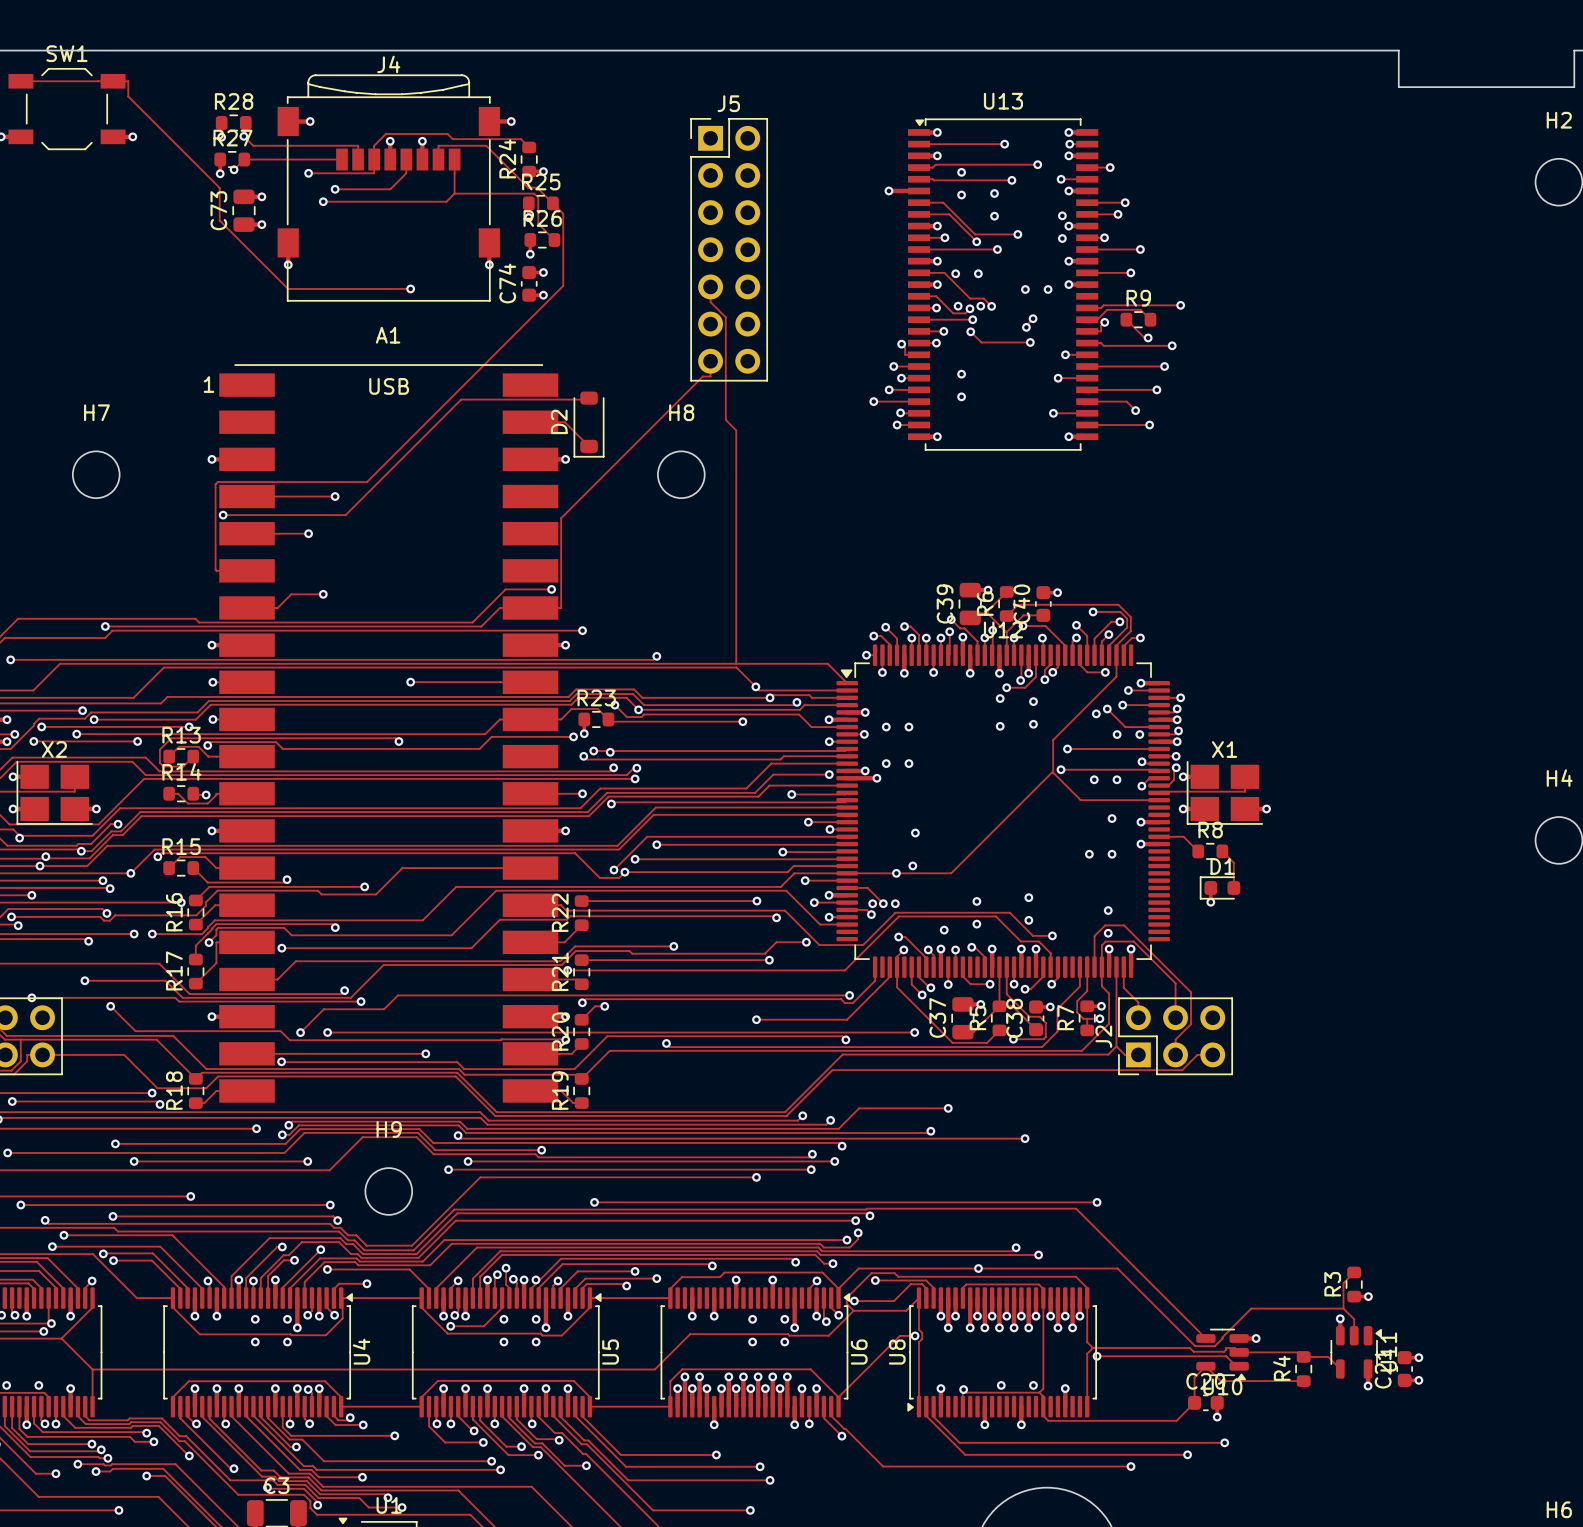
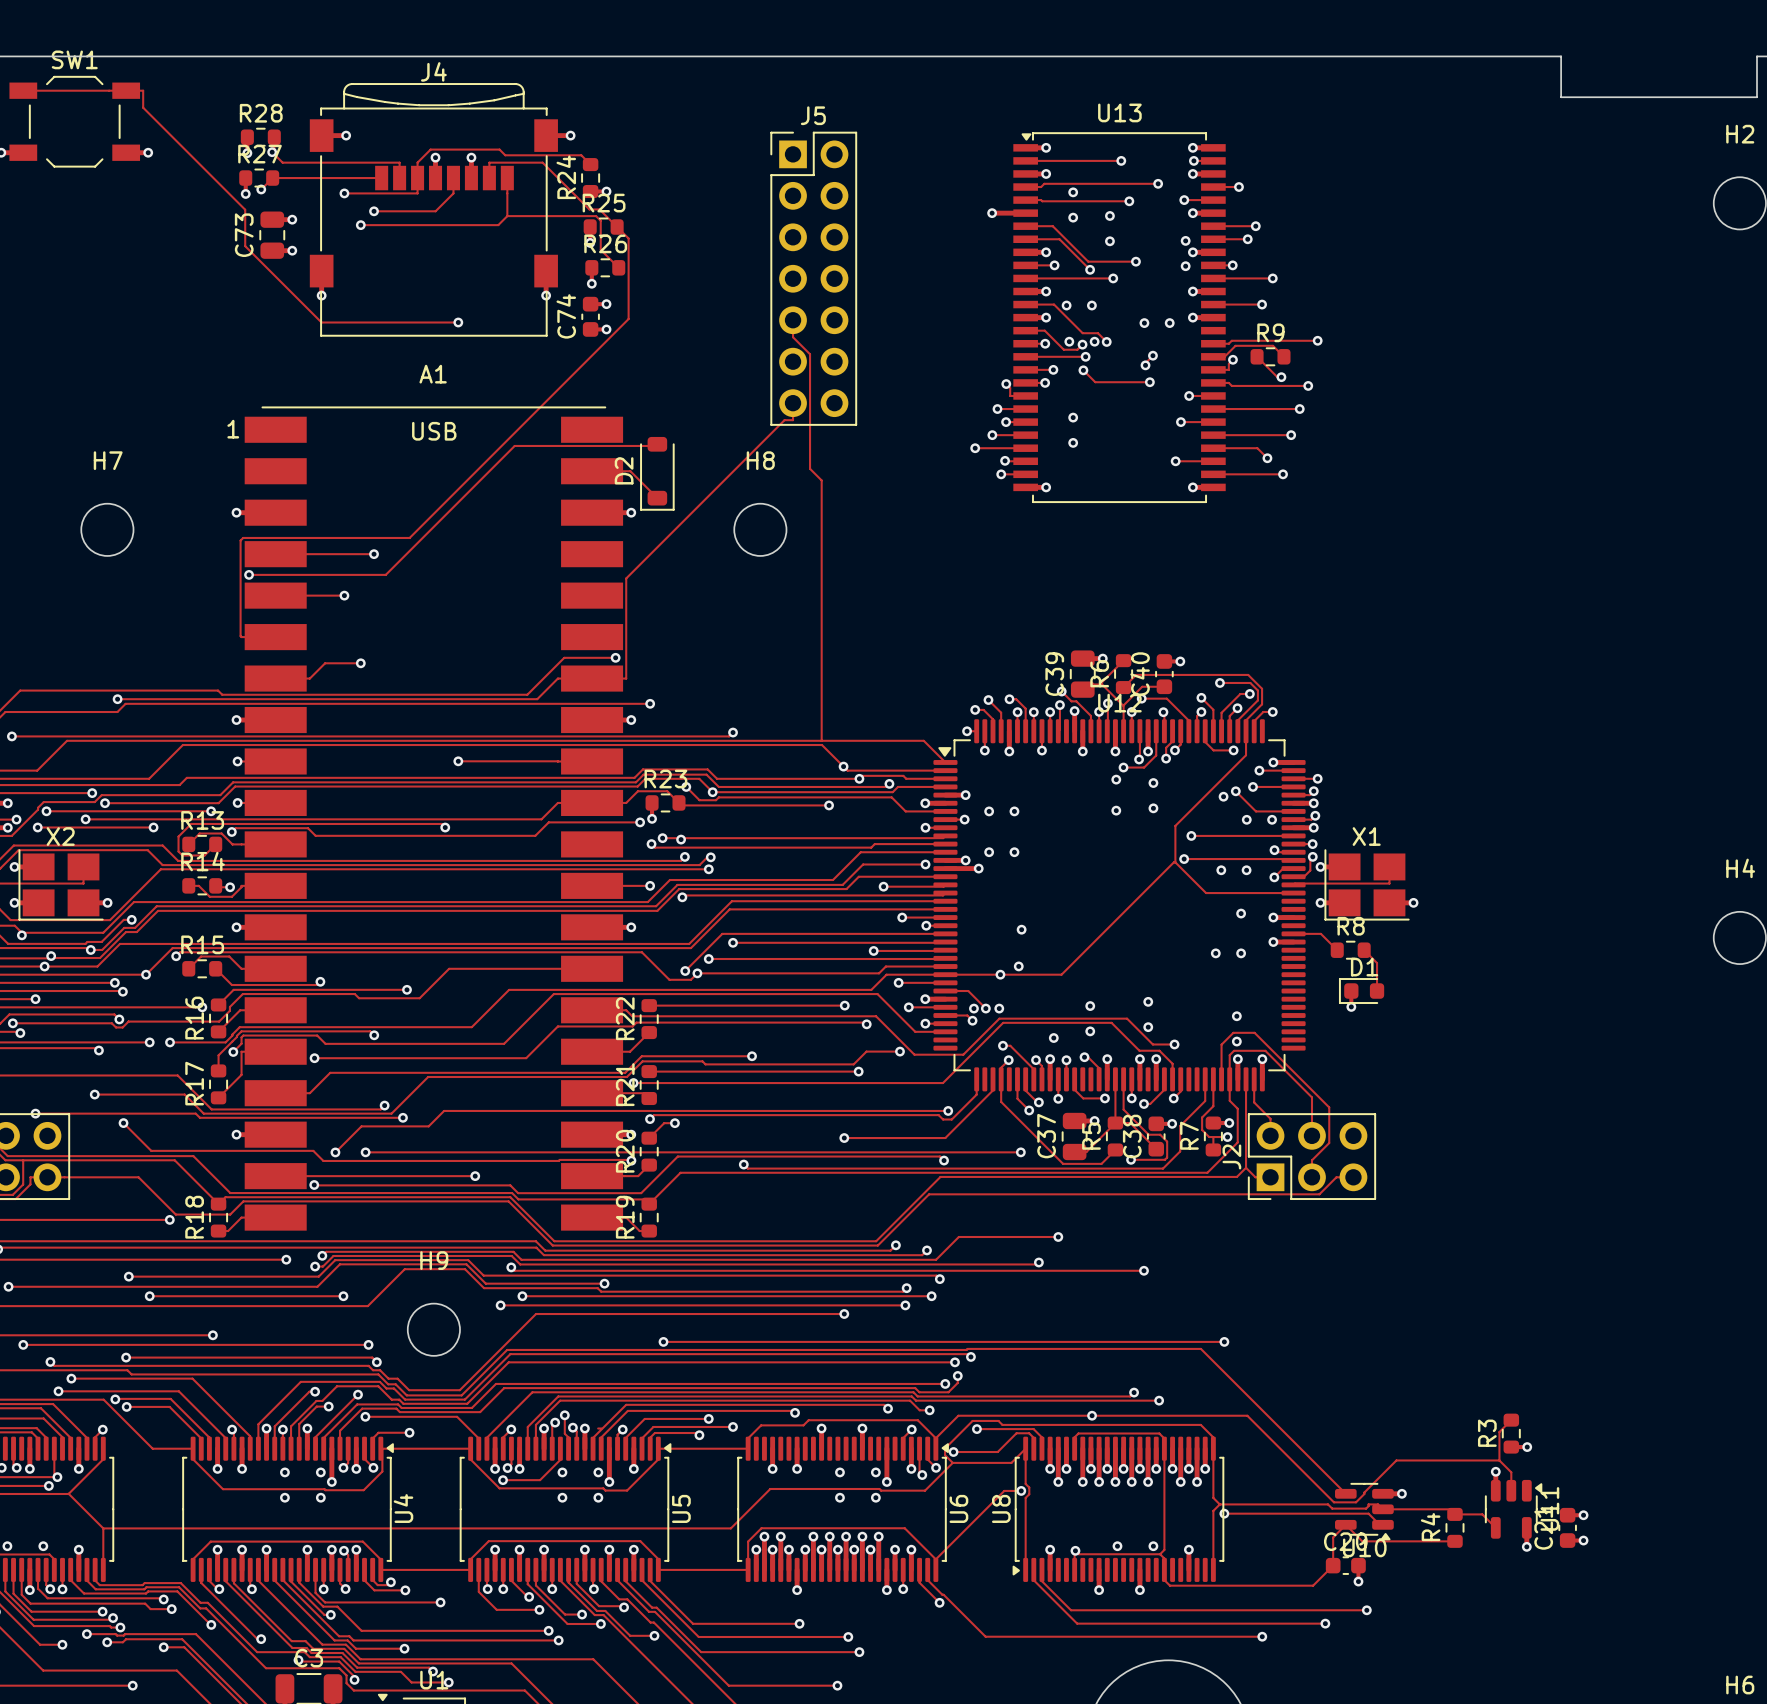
track: (12, 1101) (157, 1101) (160, 1104) -> none
via: (12, 1101) -> none
via: (160, 1104) -> none
via: (535, 1279) -> none

